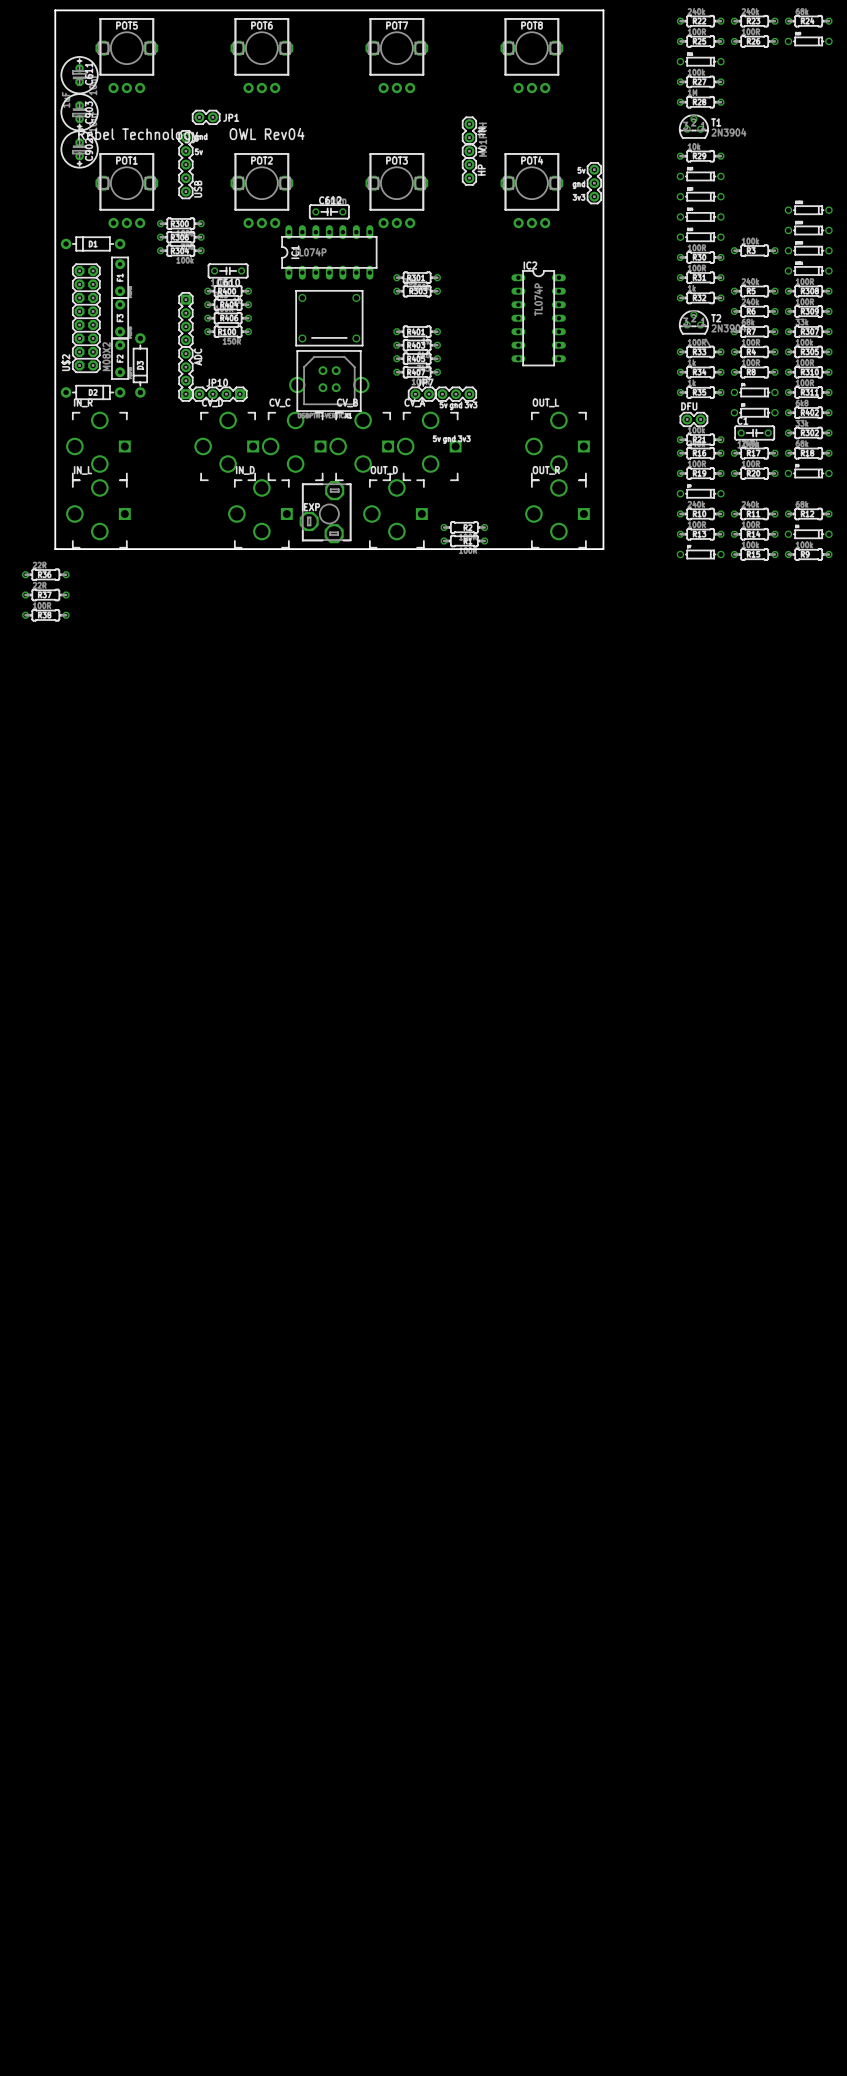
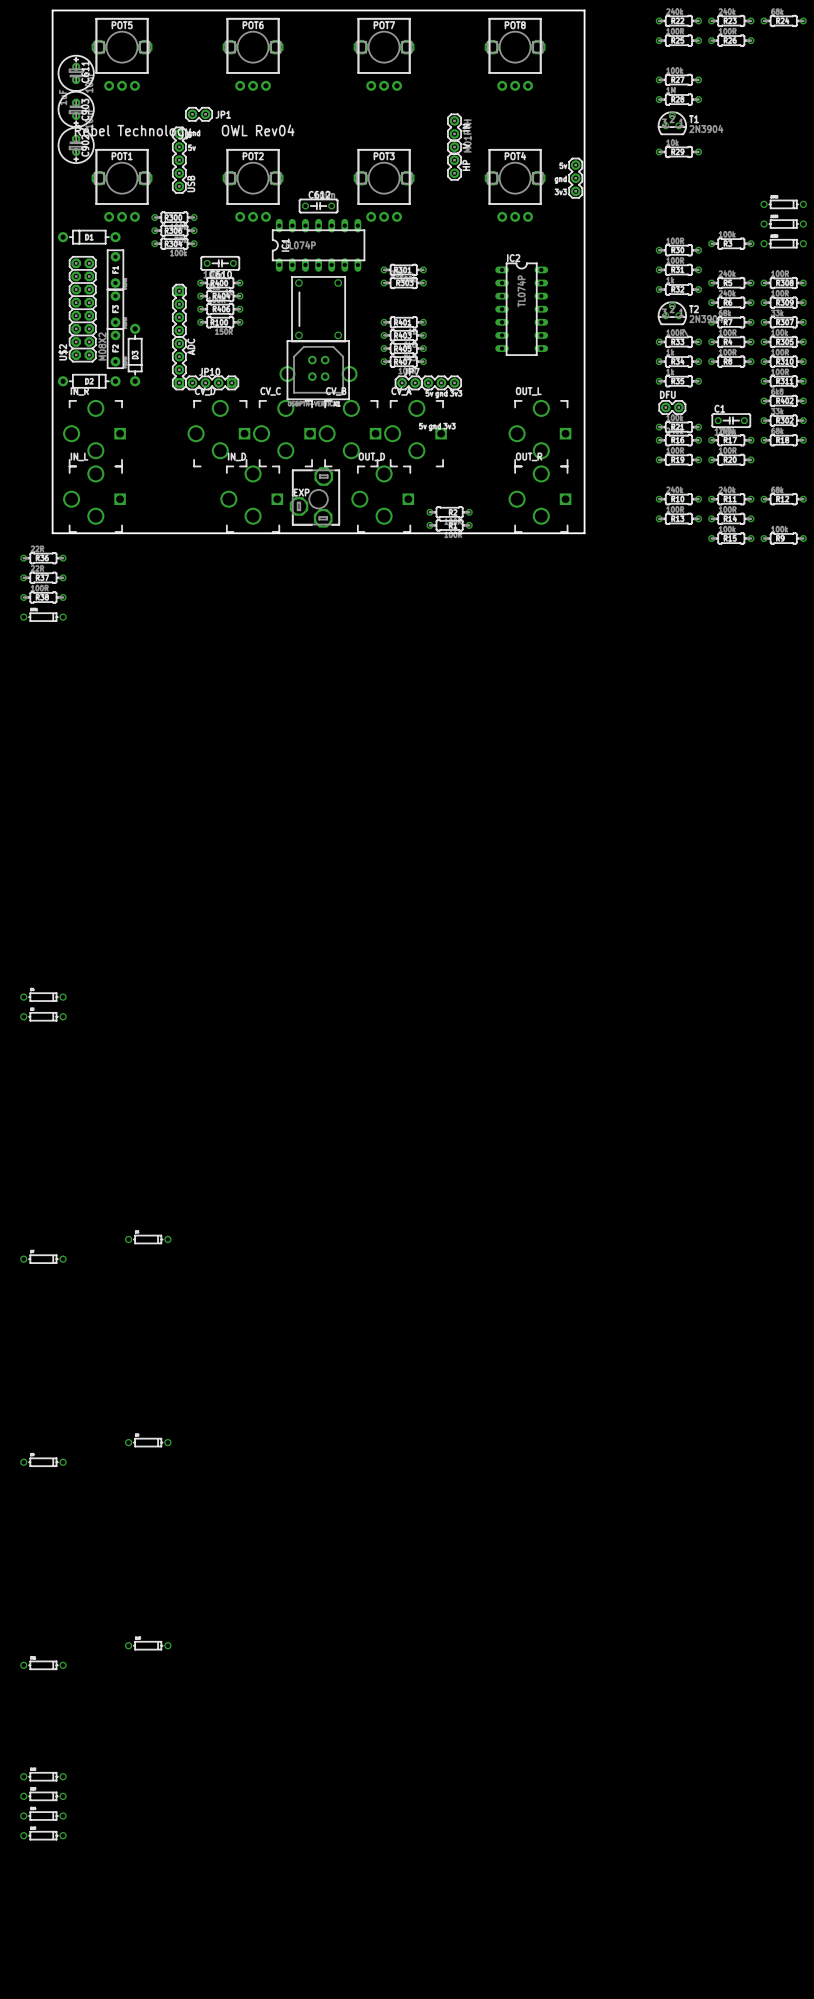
part position: (808, 41) -> (148, 1645)
part position: (700, 61) -> (43, 1665)
part position: (700, 176) -> (43, 1776)
part position: (700, 196) -> (43, 1796)
part position: (700, 216) -> (43, 1816)
part position: (700, 237) -> (43, 1835)
part position: (808, 270) -> (43, 617)
part rotation: 0° (329, 318) -> 90° clockwise (318, 309)
part position: (754, 392) -> (43, 997)
part position: (754, 412) -> (43, 1016)
part position: (808, 473) -> (148, 1442)
part position: (700, 493) -> (43, 1462)
part position: (808, 534) -> (148, 1239)
part position: (700, 554) -> (43, 1259)

